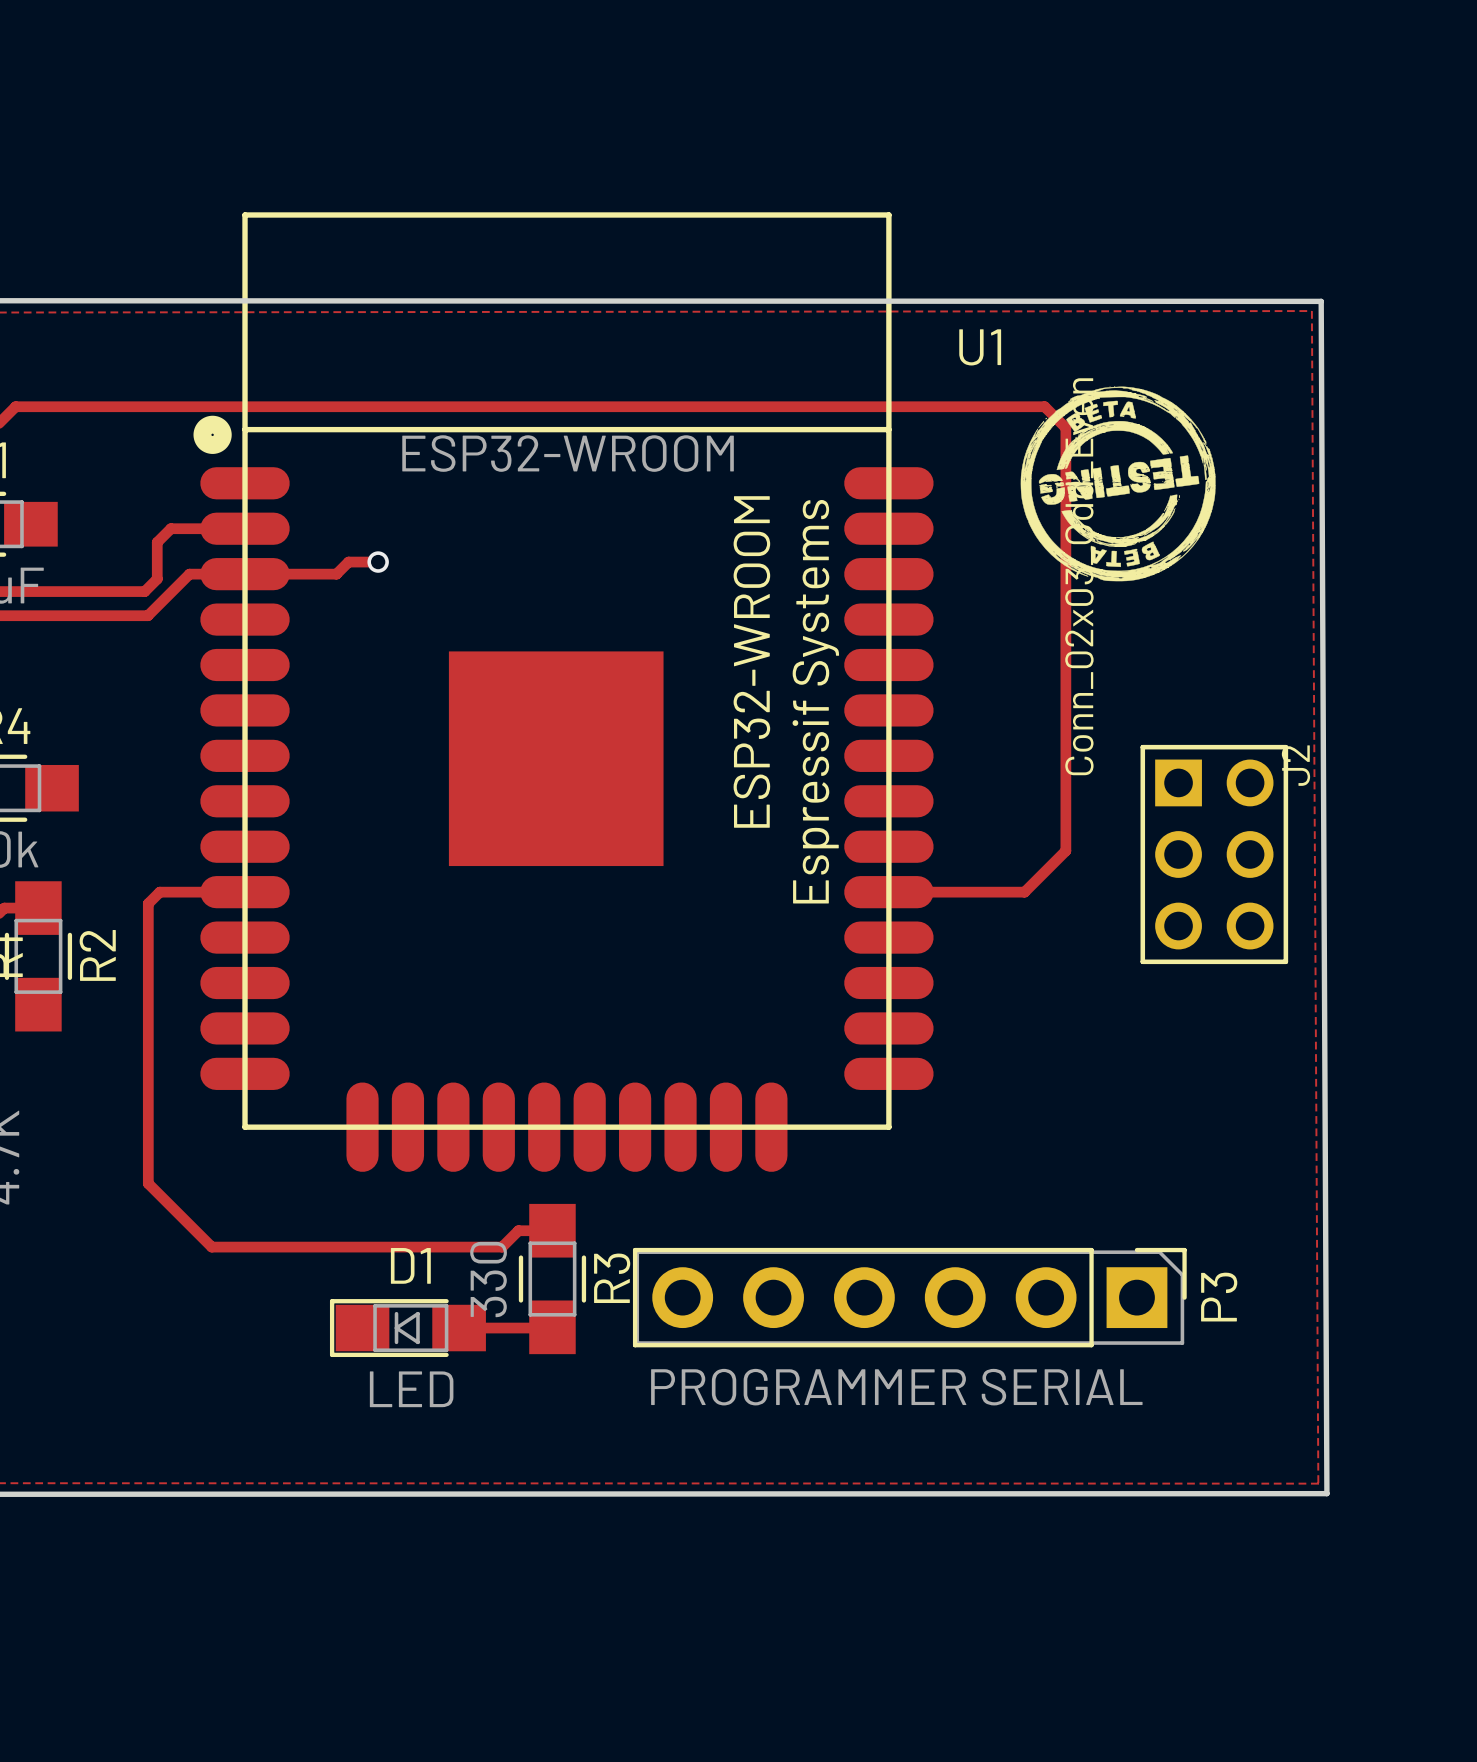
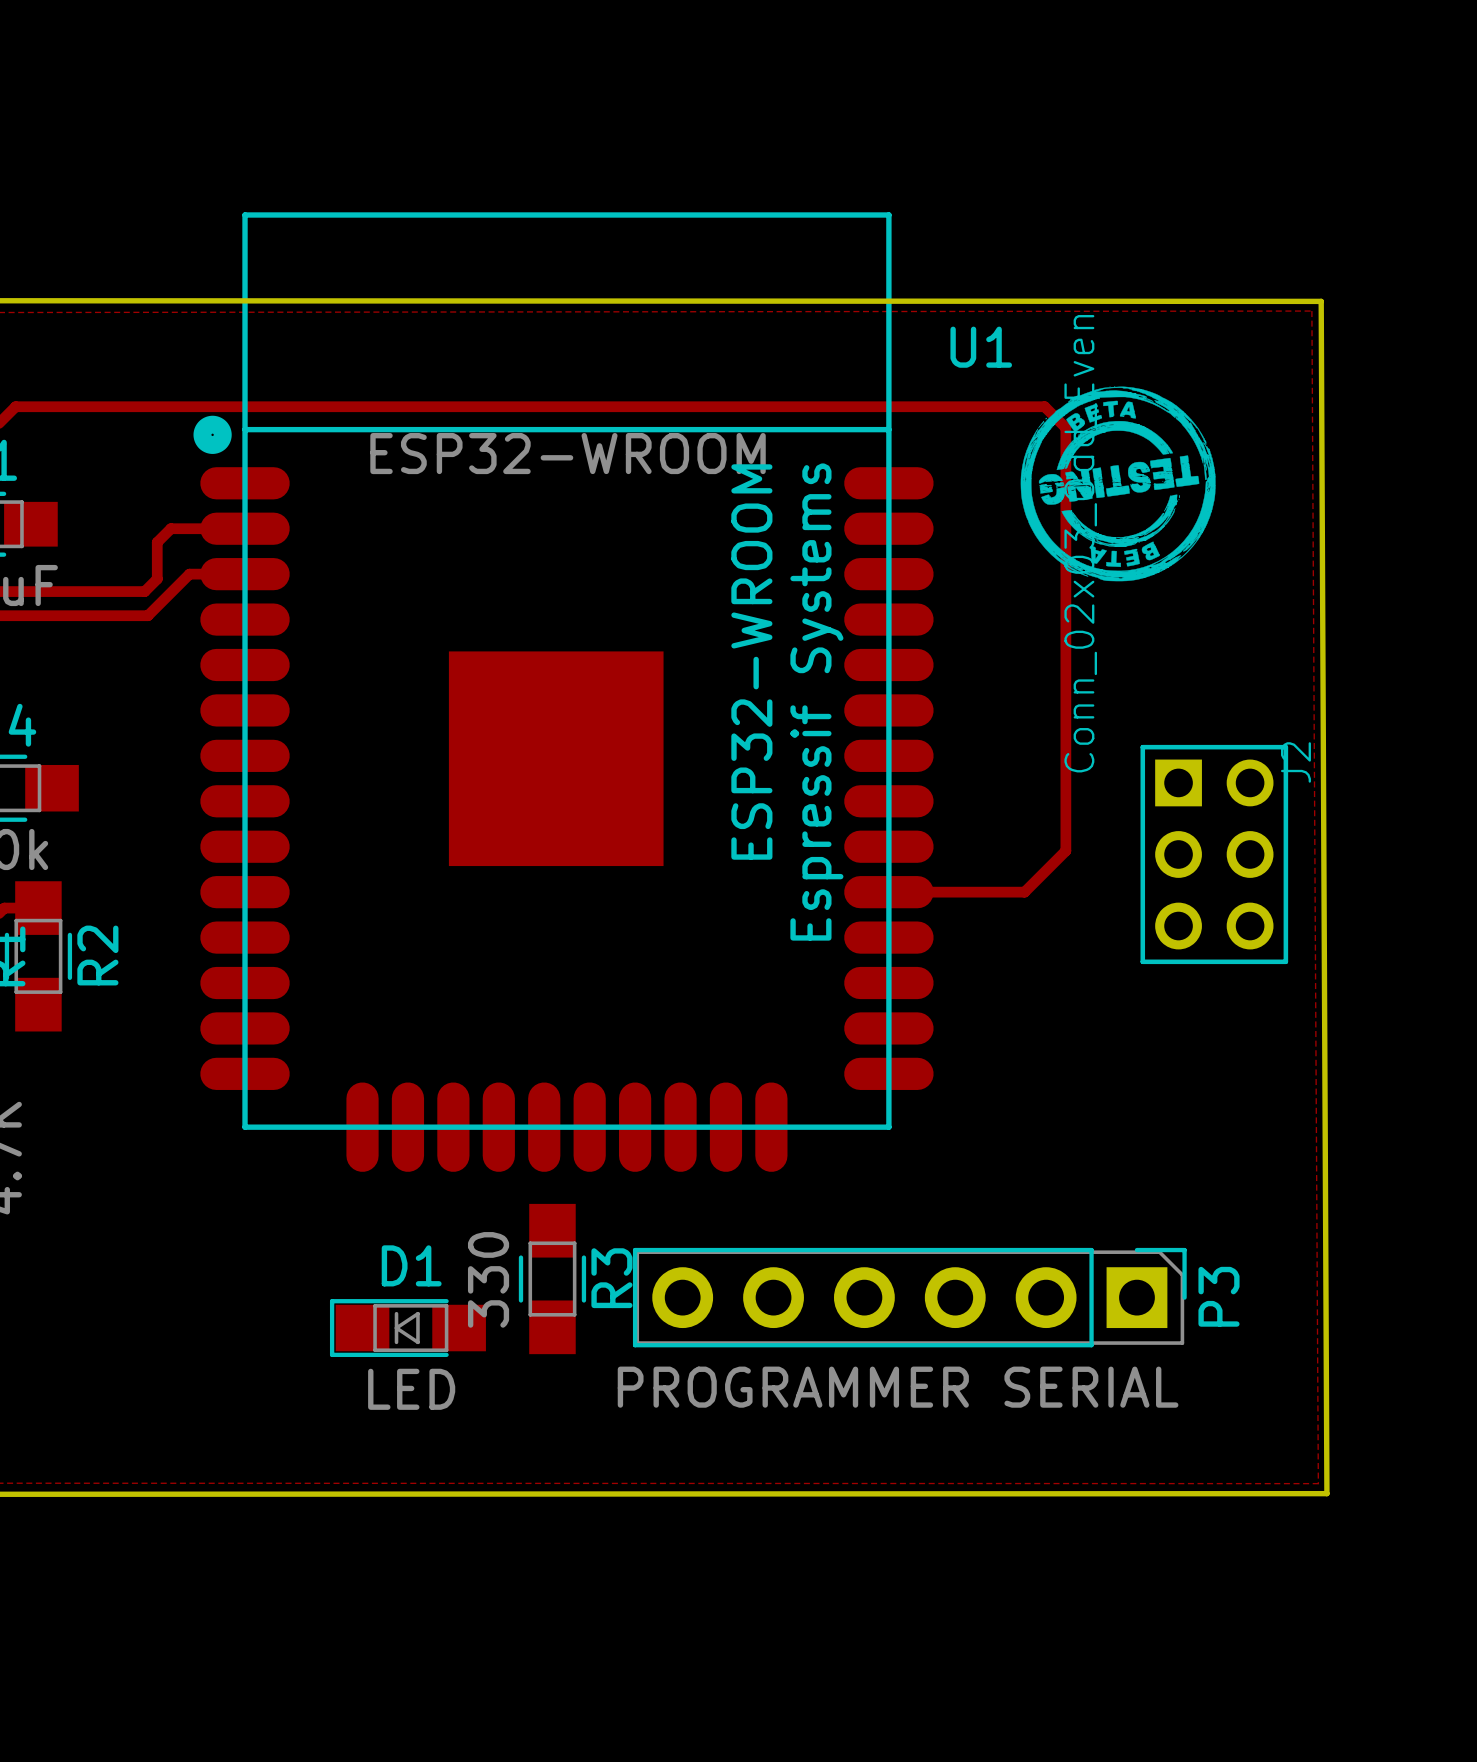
track: (378, 562) (348, 562) (336, 574) (245, 574) -> none
via: (378, 562) -> none
track: (245, 892) (159, 892) (148, 903) (148, 1183) (211, 1247) (502, 1247) (518, 1230) (552, 1230) -> none
track: (552, 1327) (459, 1328) -> none

